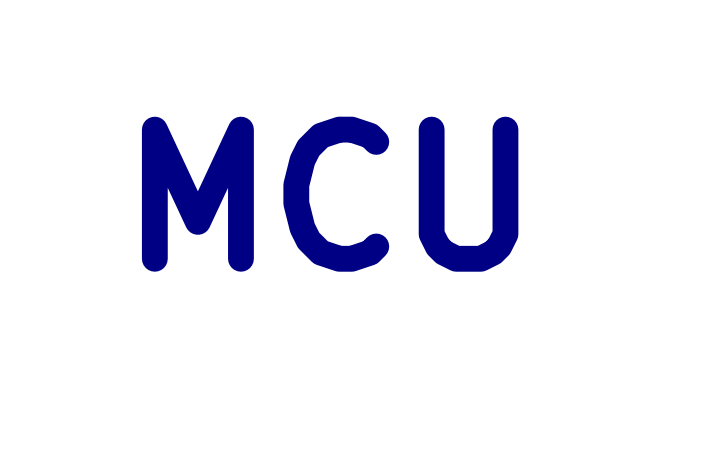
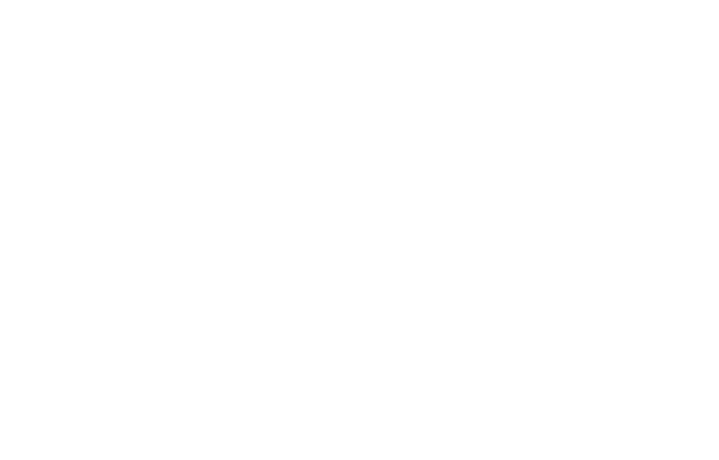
text: MCU (330, 194) -> none

